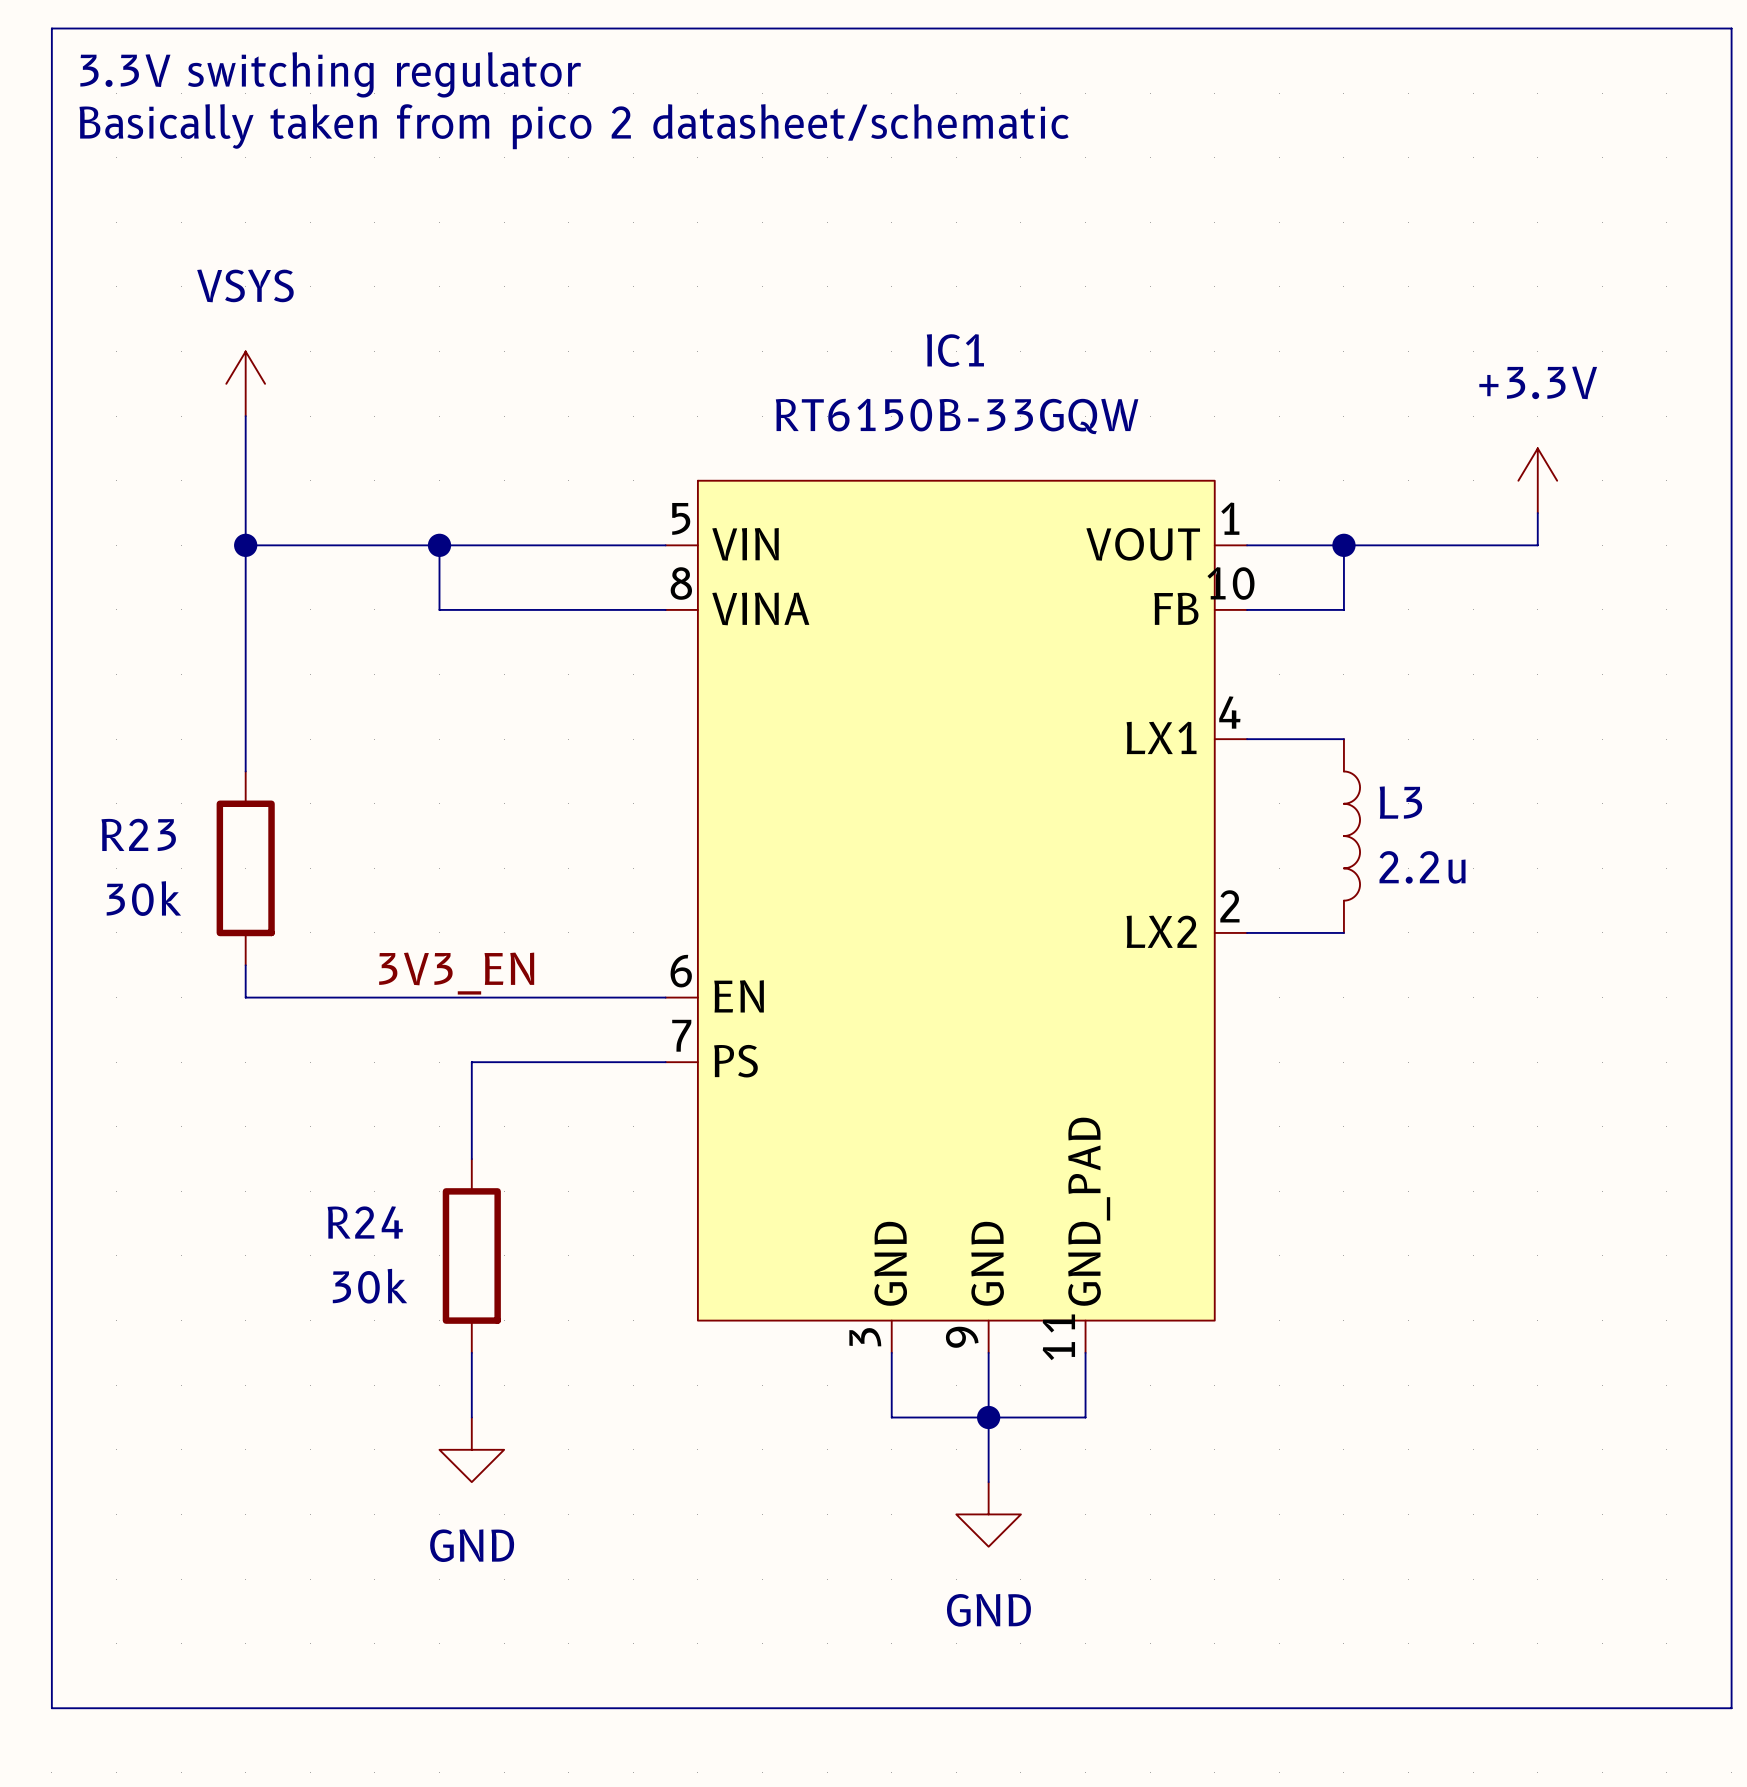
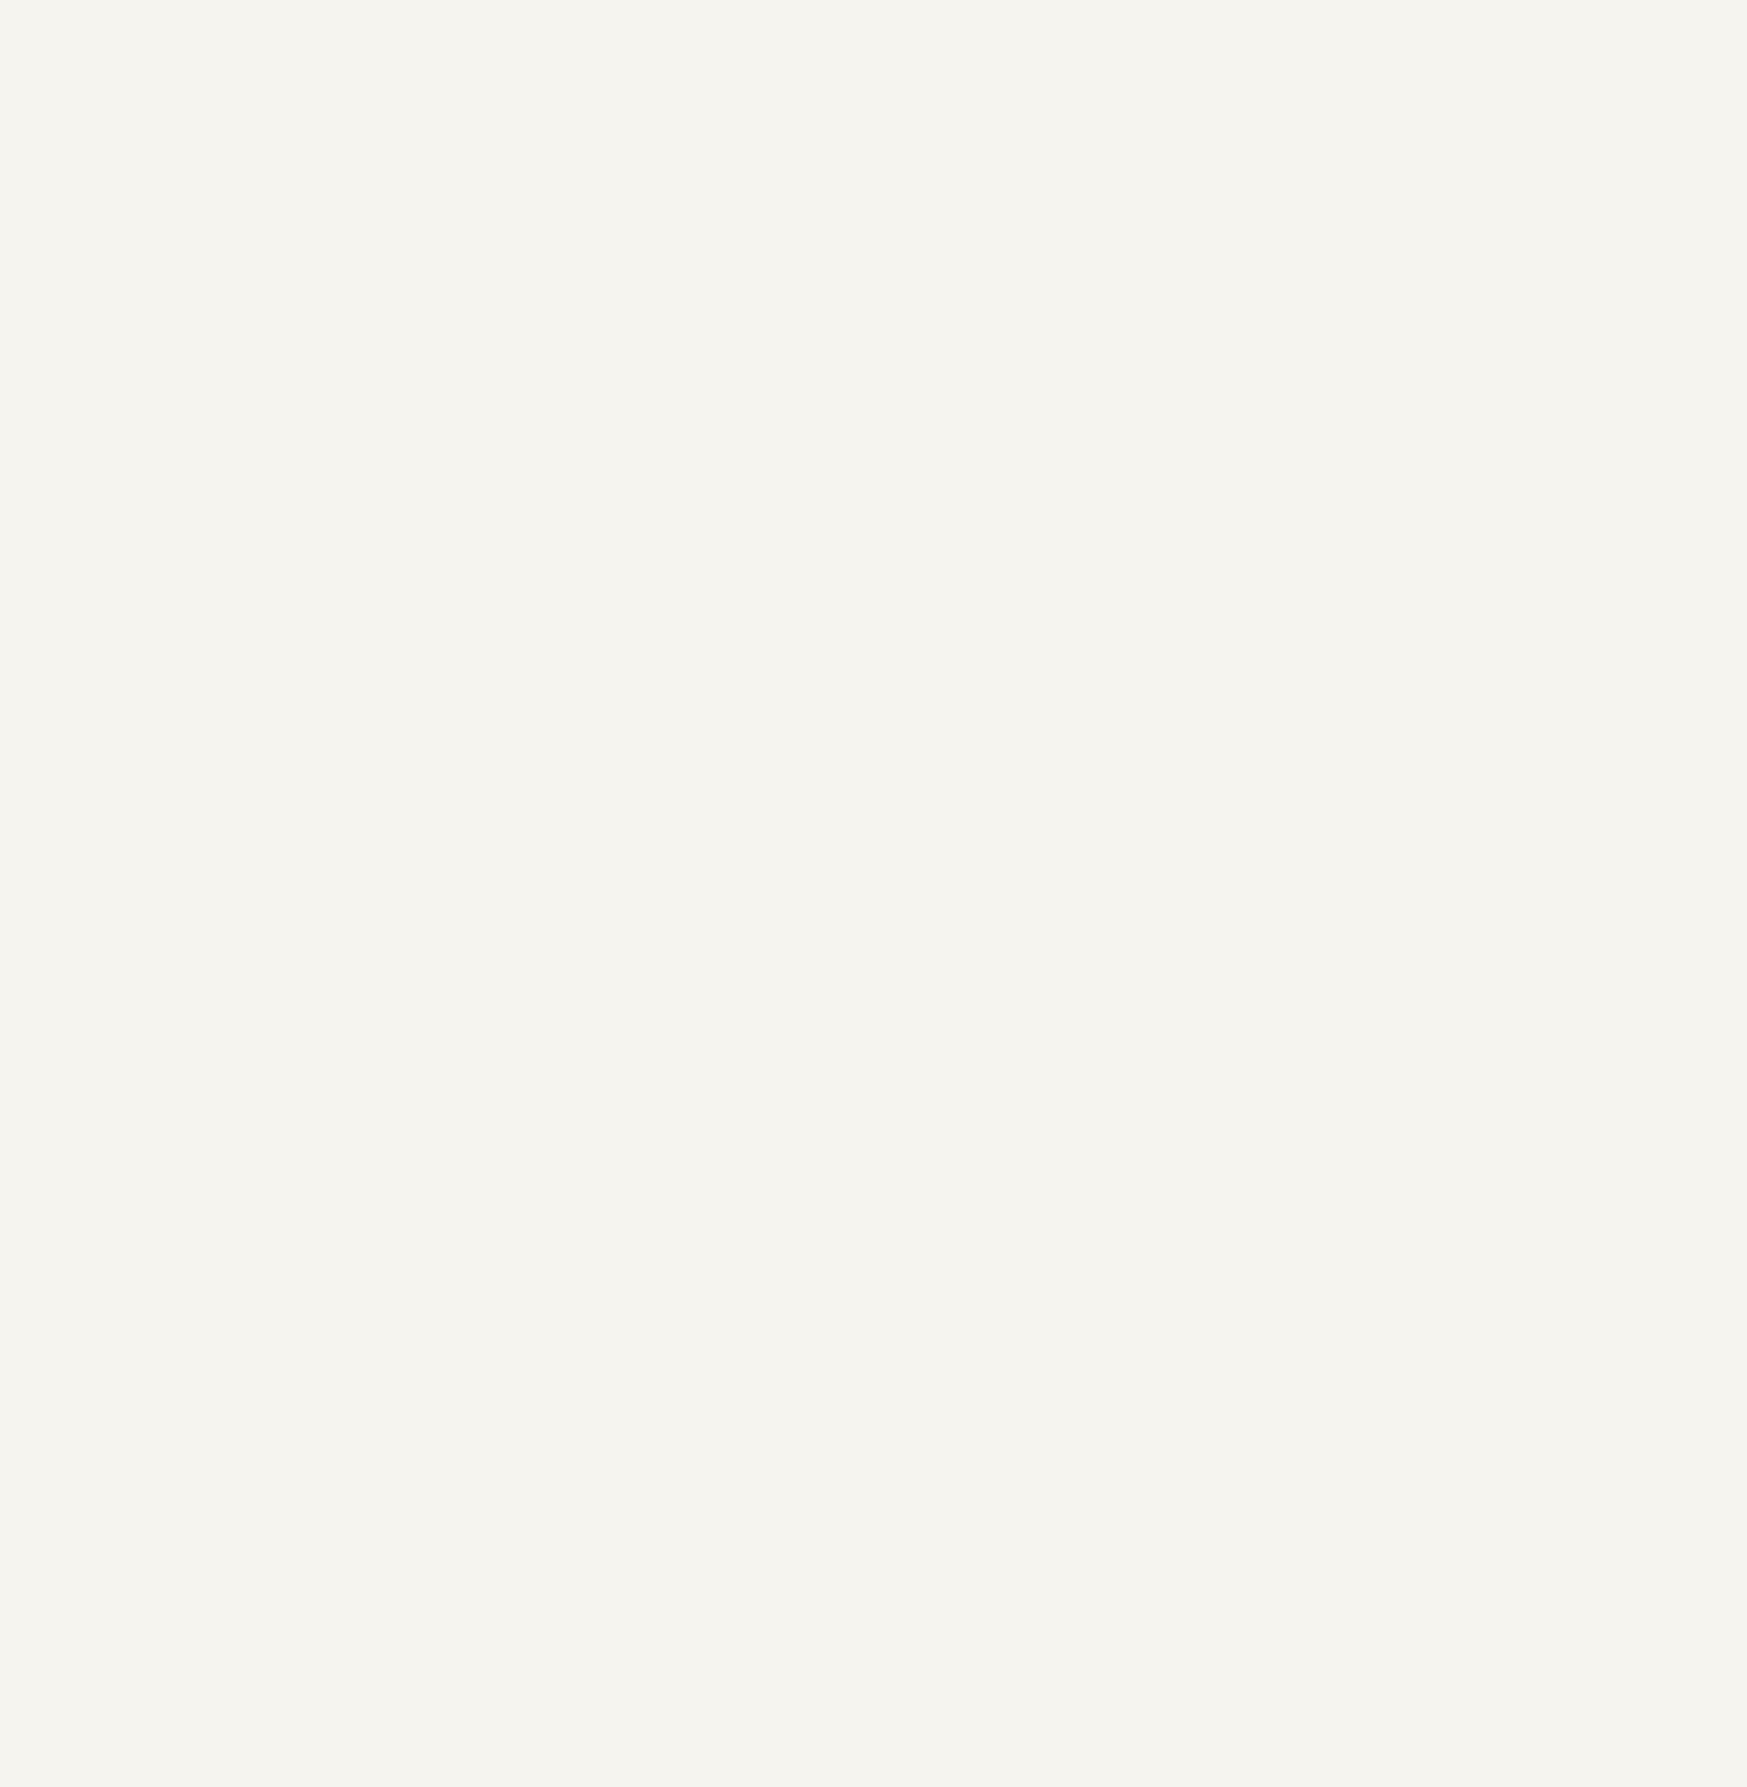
line: (51, 28) (1731, 28) (1731, 1708) (51, 1708) (51, 28) -> none
text: 3.3V switching regulator (330, 74) -> none
text: Basically taken from pico 2 datasheet/schematic (574, 126) -> none
power symbol: VSYS (245, 383) -> none
wire: (245, 416) (245, 771) -> none
power symbol: +3.3V (1537, 480) -> none
wire: (1537, 513) (1537, 545) (1247, 545) -> none
wire: (245, 545) (665, 545) -> none
junction: (245, 545) -> none
wire: (439, 545) (439, 609) (665, 609) -> none
junction: (439, 545) -> none
wire: (1343, 545) (1343, 609) (1247, 609) -> none
junction: (1343, 545) -> none
wire: (1247, 739) (1343, 739) -> none
L3: 2.2u (1352, 836) -> none
R23: 30k (245, 868) -> none
IC1: RT6150B-33GQW (956, 916) -> none
wire: (1247, 932) (1343, 932) -> none
wire: (245, 965) (245, 997) (665, 997) -> none
label: 3V3_EN (456, 973) -> none
wire: (665, 1062) (471, 1062) (471, 1159) -> none
R24: 30k (471, 1255) -> none
wire: (471, 1352) (471, 1417) -> none
wire: (891, 1352) (891, 1417) (1085, 1417) (1085, 1352) -> none
wire: (988, 1352) (988, 1482) -> none
junction: (988, 1417) -> none
power symbol: GND (471, 1449) -> none
power symbol: GND (988, 1514) -> none

